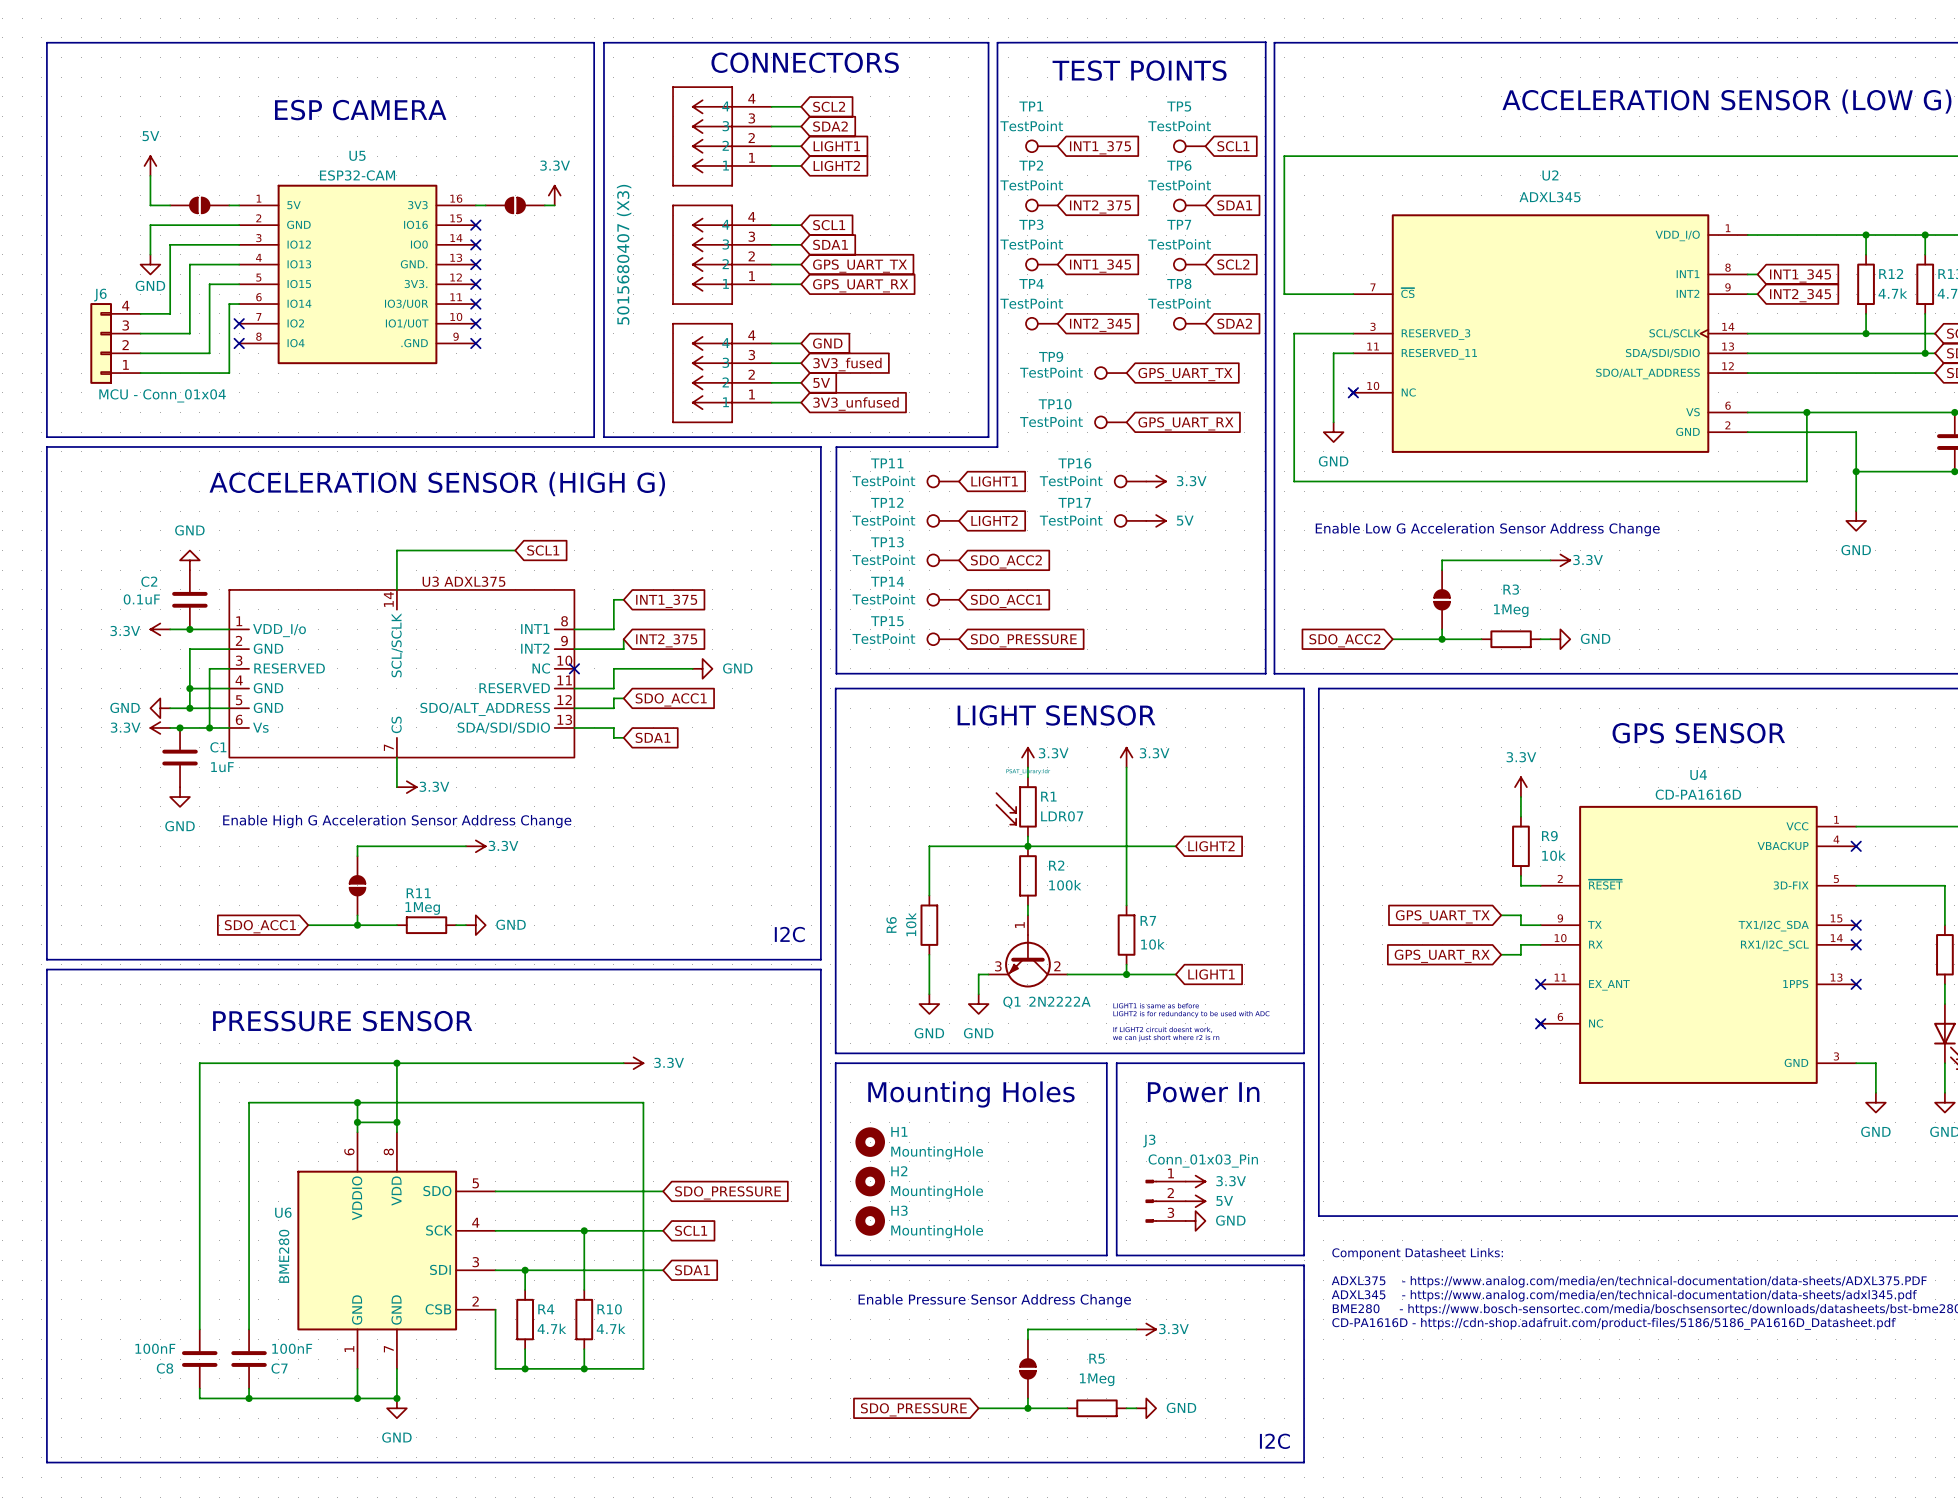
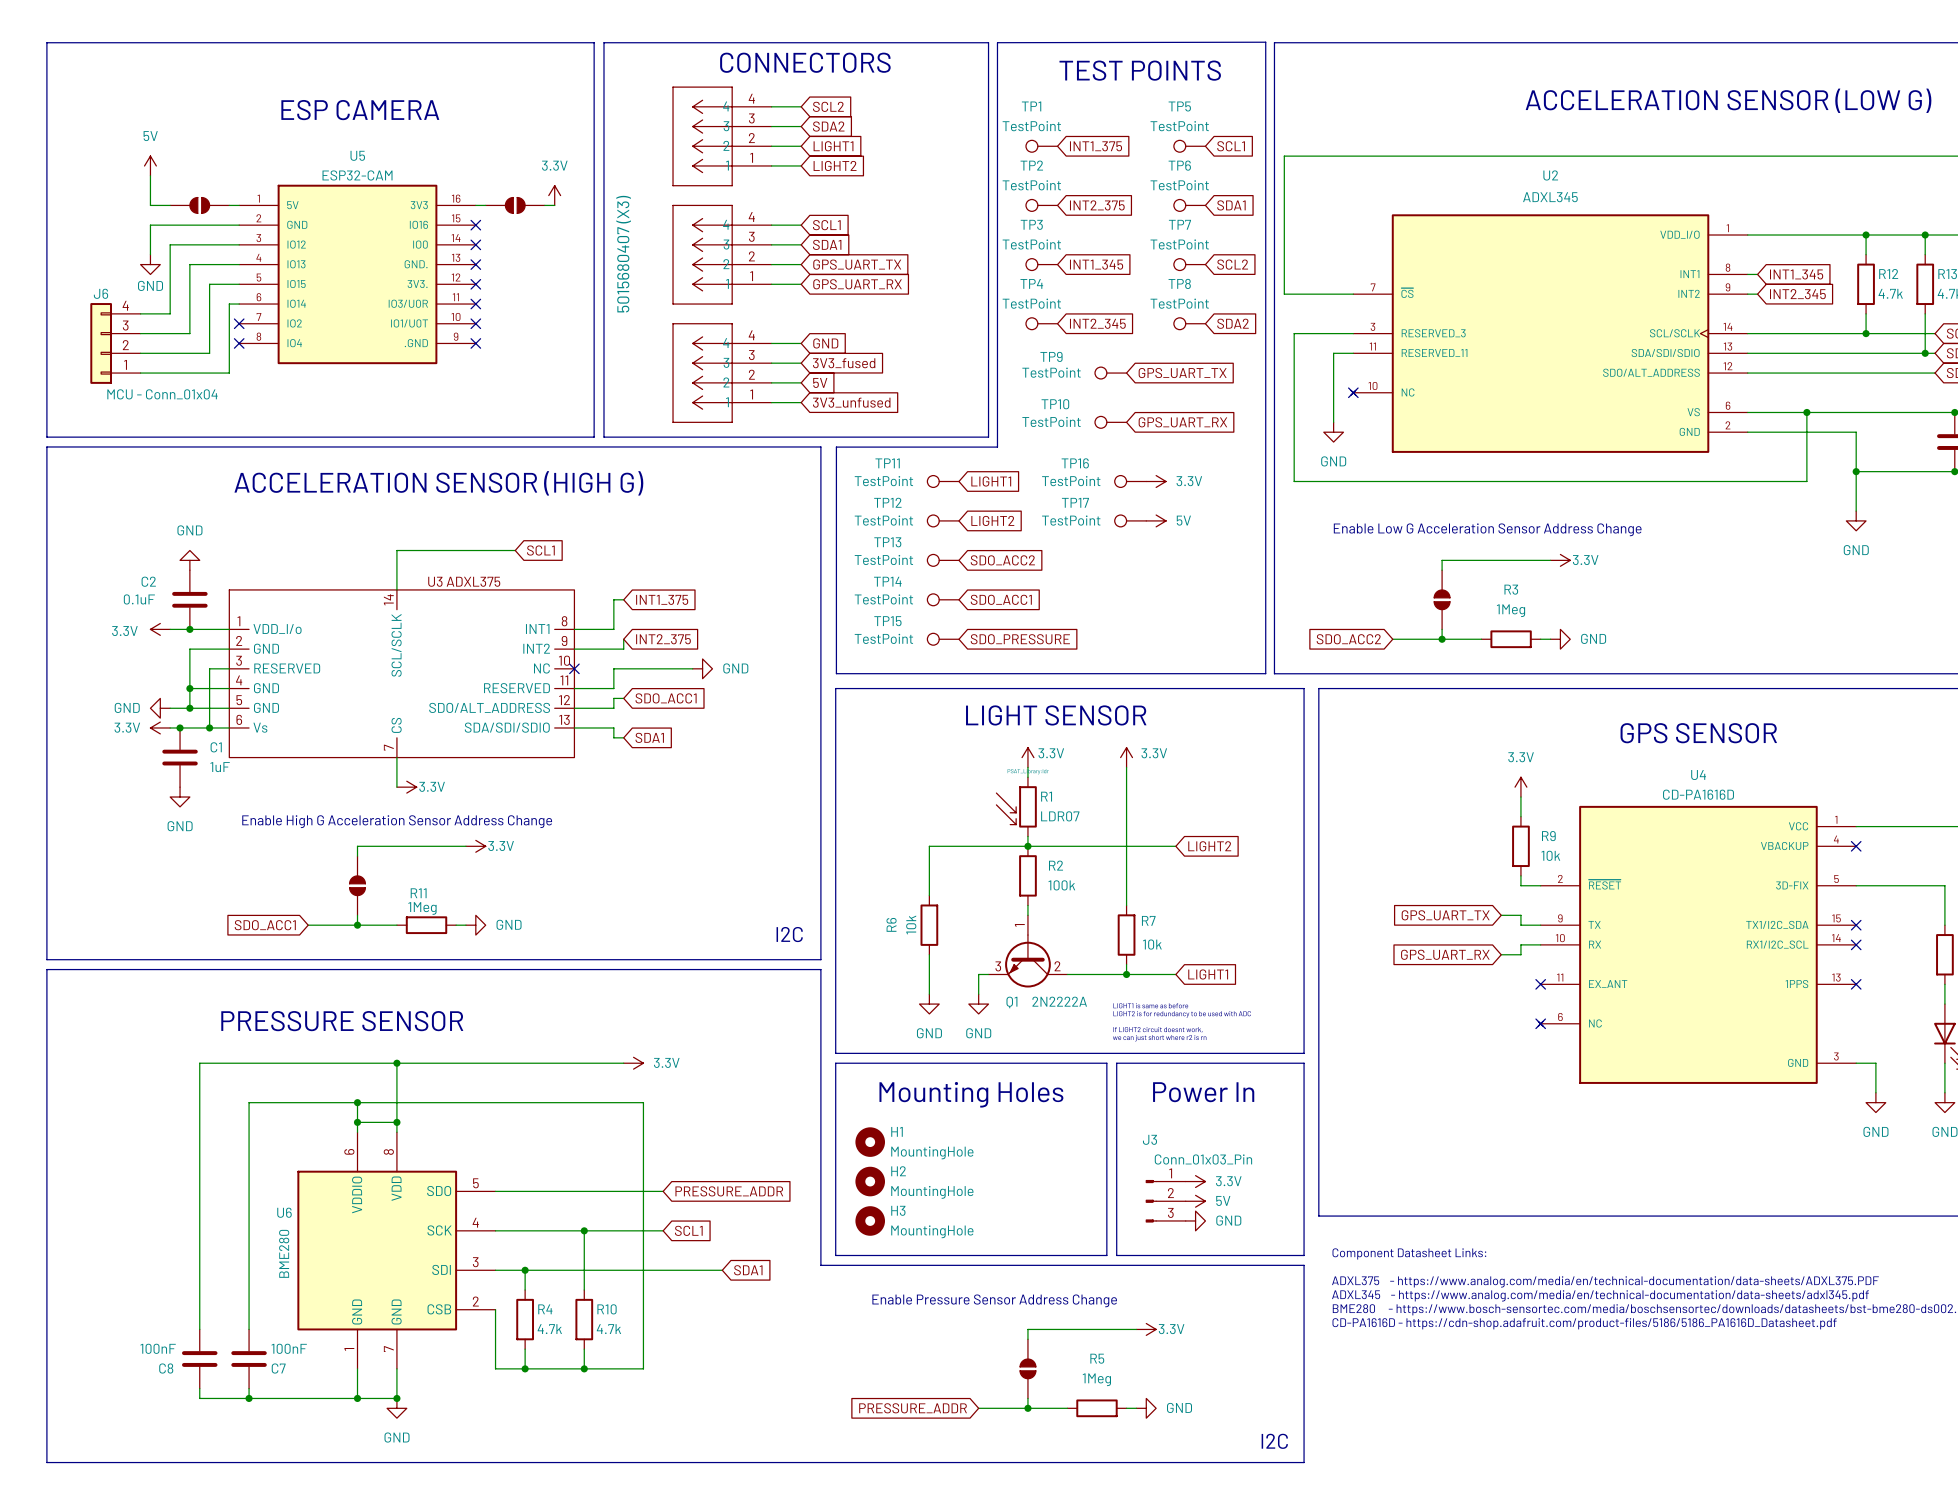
global label: SDO_PRESSURE (728, 1192) -> PRESSURE_ADDR (729, 1191)
wire: none -> (663, 1270) (722, 1270)
global label position: SDA1 (692, 1270) -> SDA1 (748, 1270)
global label: SDO_PRESSURE (913, 1409) -> PRESSURE_ADDR (913, 1408)

